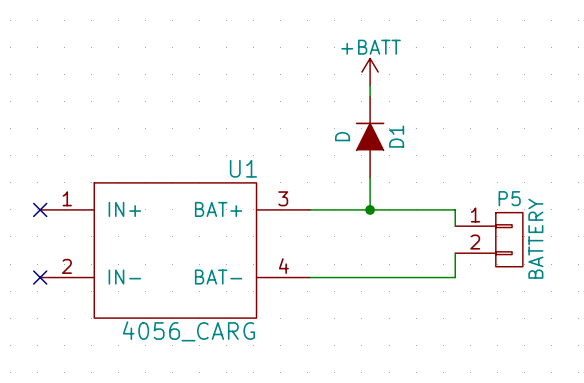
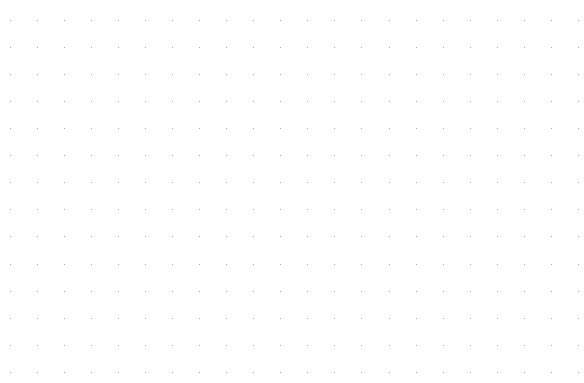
power symbol: +BATT (370, 72) -> none
wire: (370, 85) (370, 96) -> none
D1: D (370, 136) -> none
wire: (370, 177) (370, 209) -> none
no-connect mark: (40, 209) -> none
wire: (310, 209) (455, 209) (455, 226) -> none
junction: (370, 209) -> none
P5: BATTERY (489, 239) -> none
U1: 4056_CARG (175, 250) -> none
wire: (455, 253) (455, 277) (310, 277) -> none
no-connect mark: (40, 277) -> none

